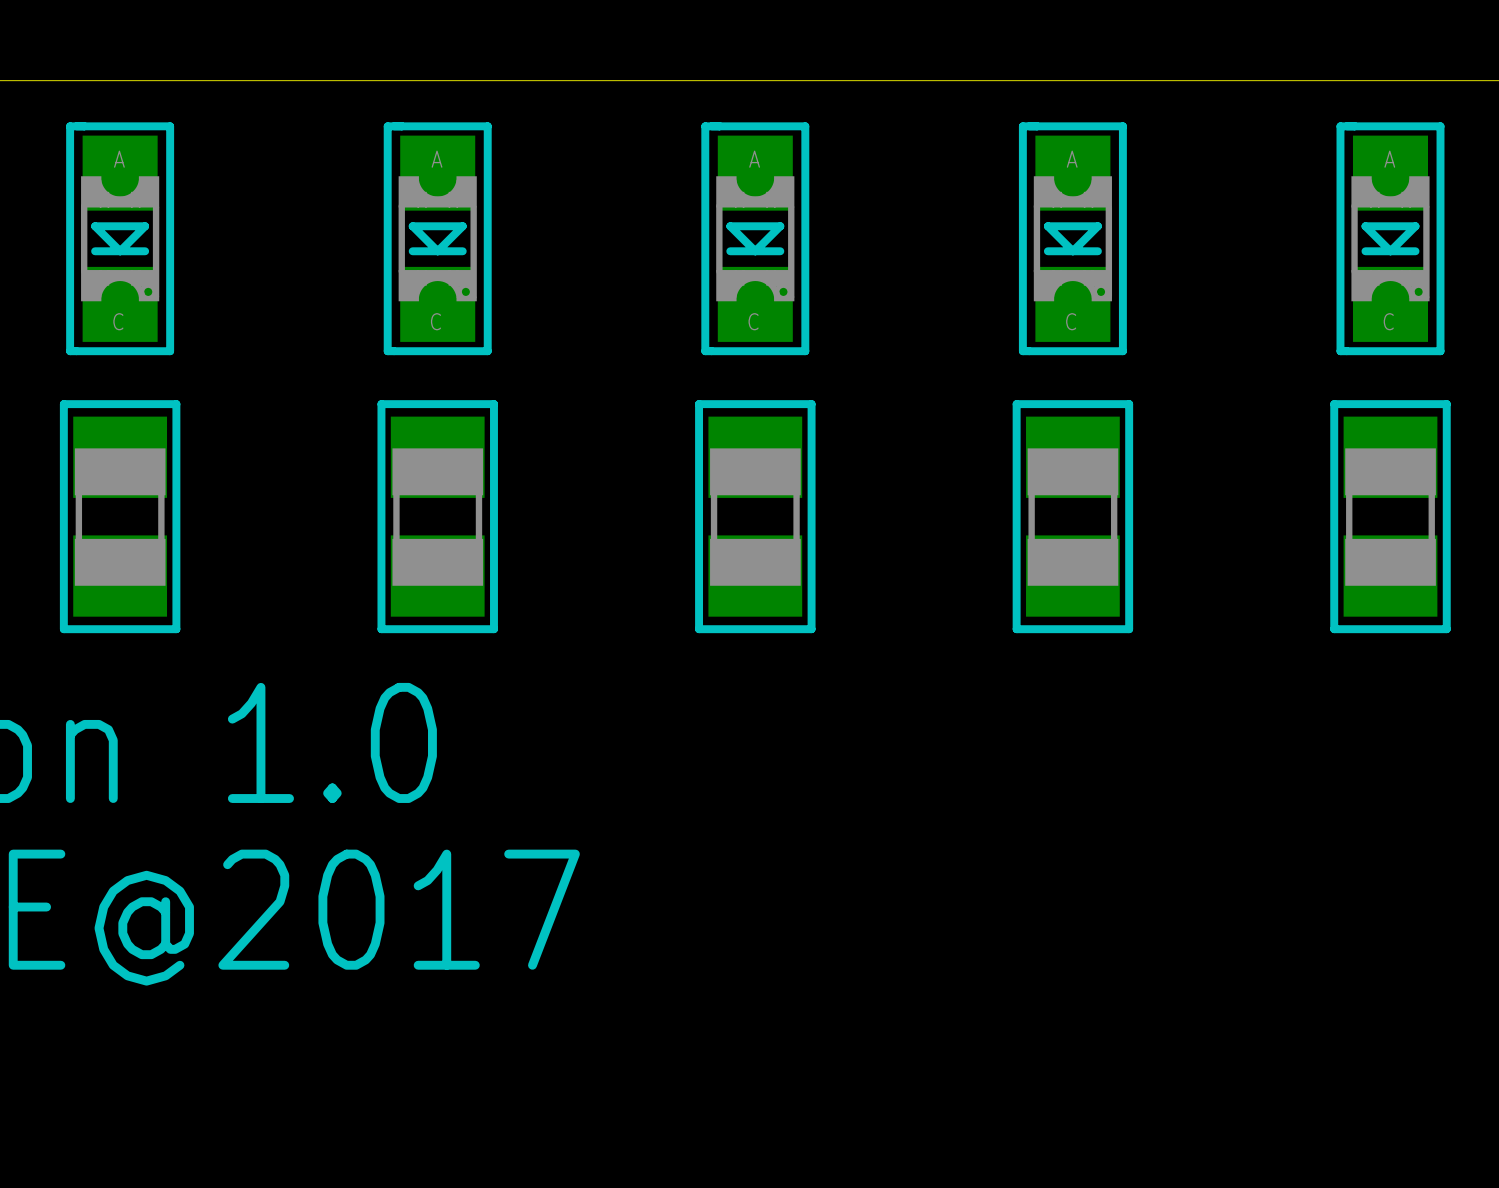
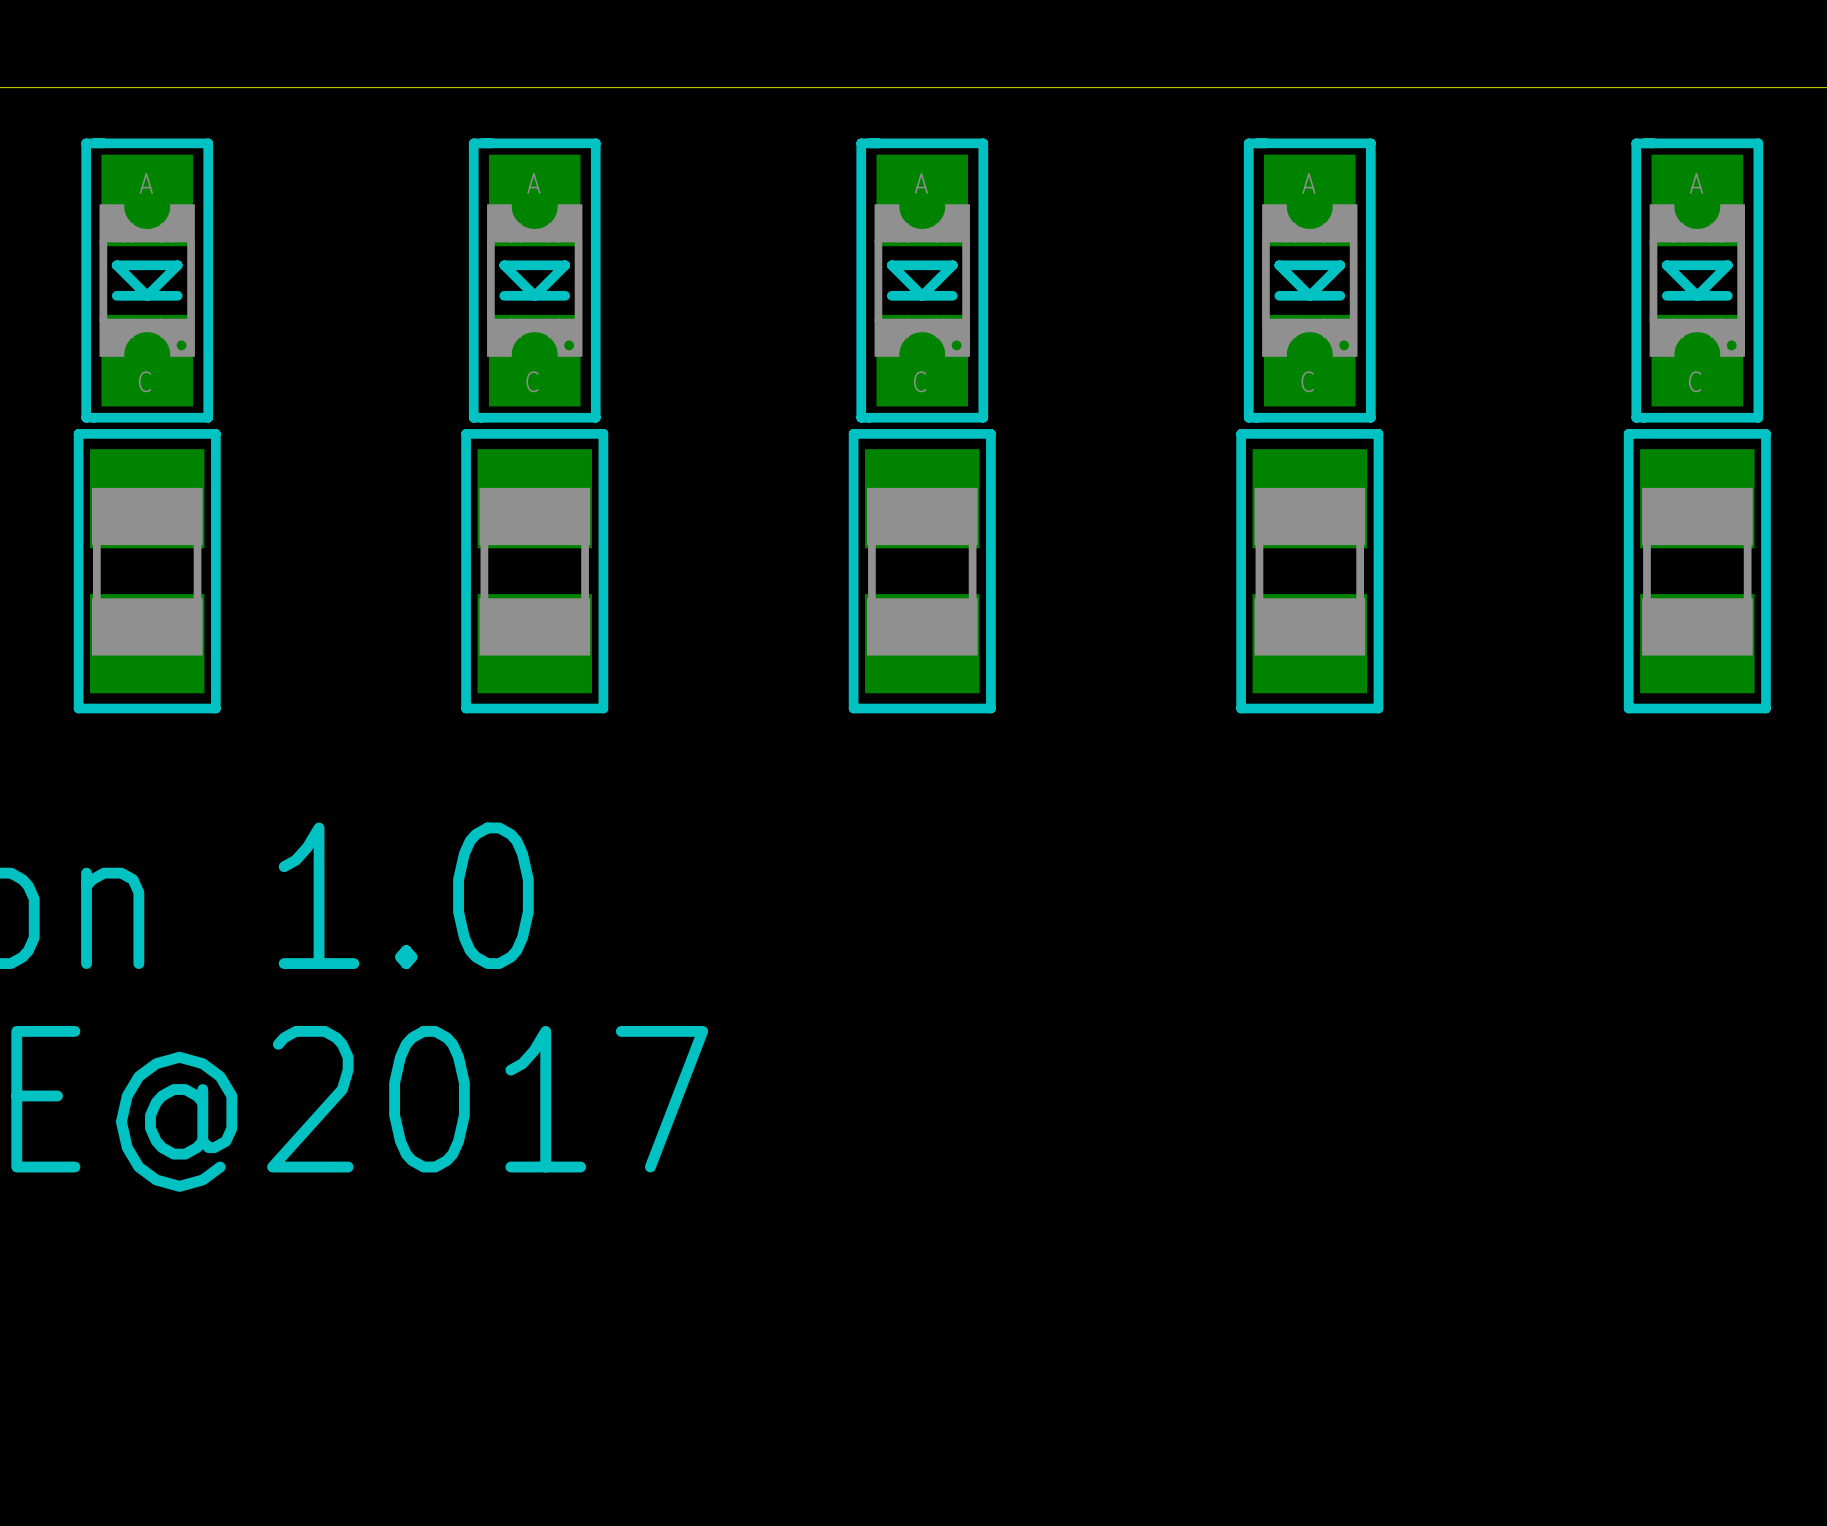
part position: (120, 516) -> (147, 571)
part position: (437, 516) -> (534, 571)
part position: (755, 516) -> (922, 571)
part position: (1072, 516) -> (1309, 571)
part position: (1390, 516) -> (1697, 571)

